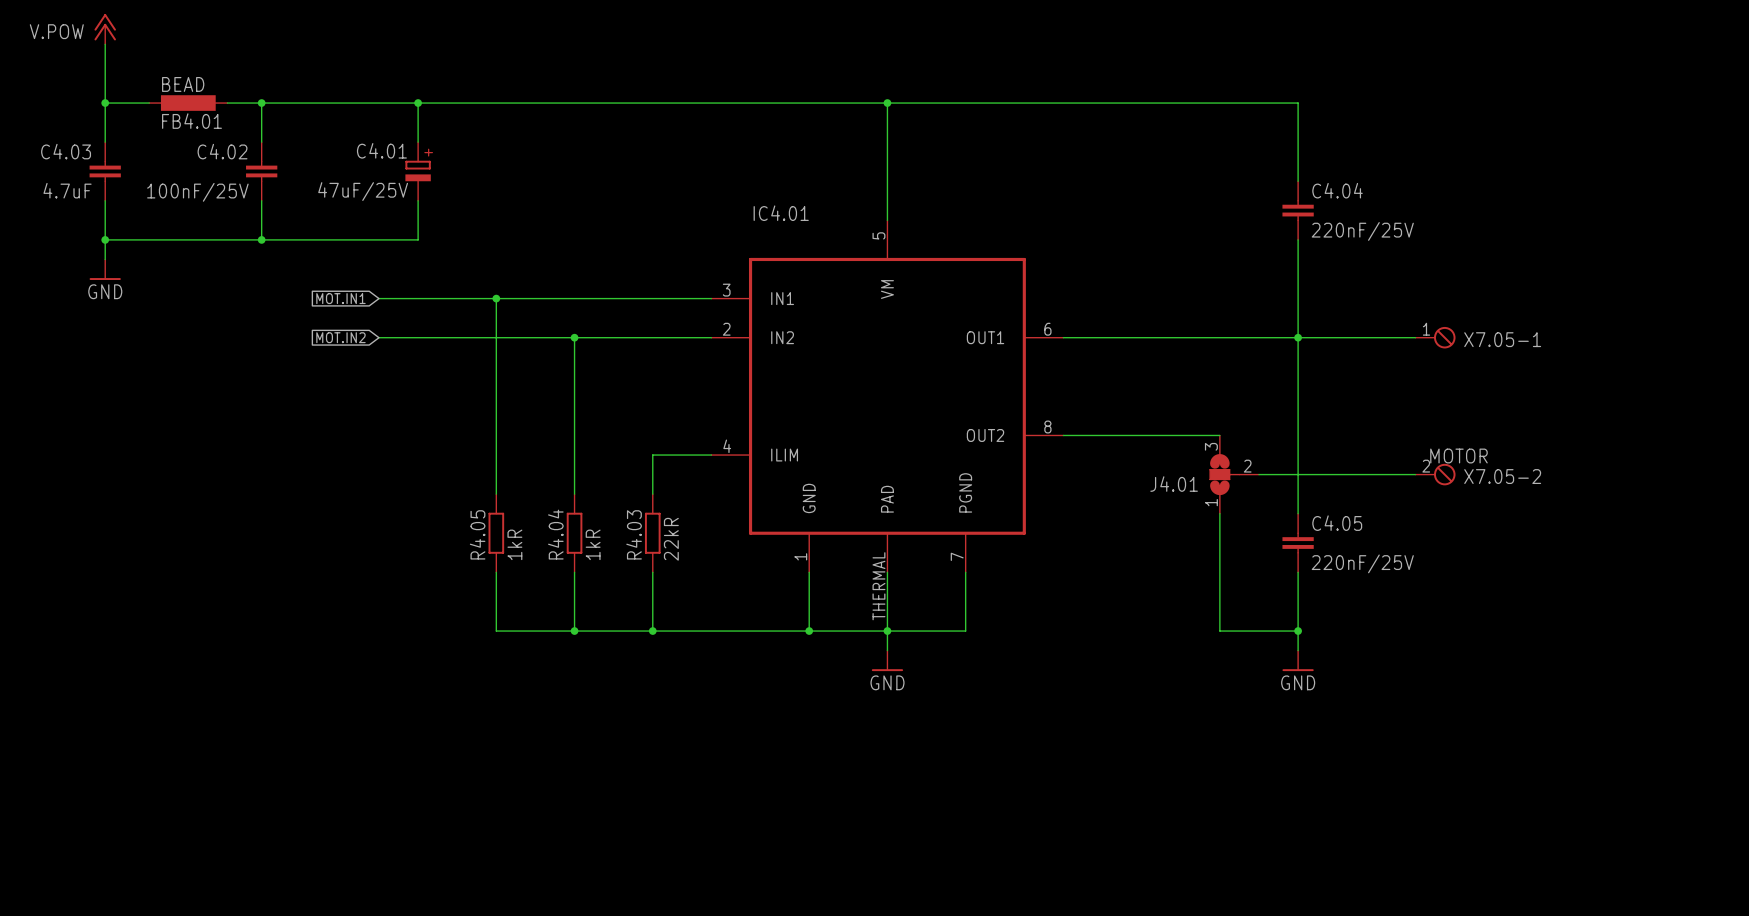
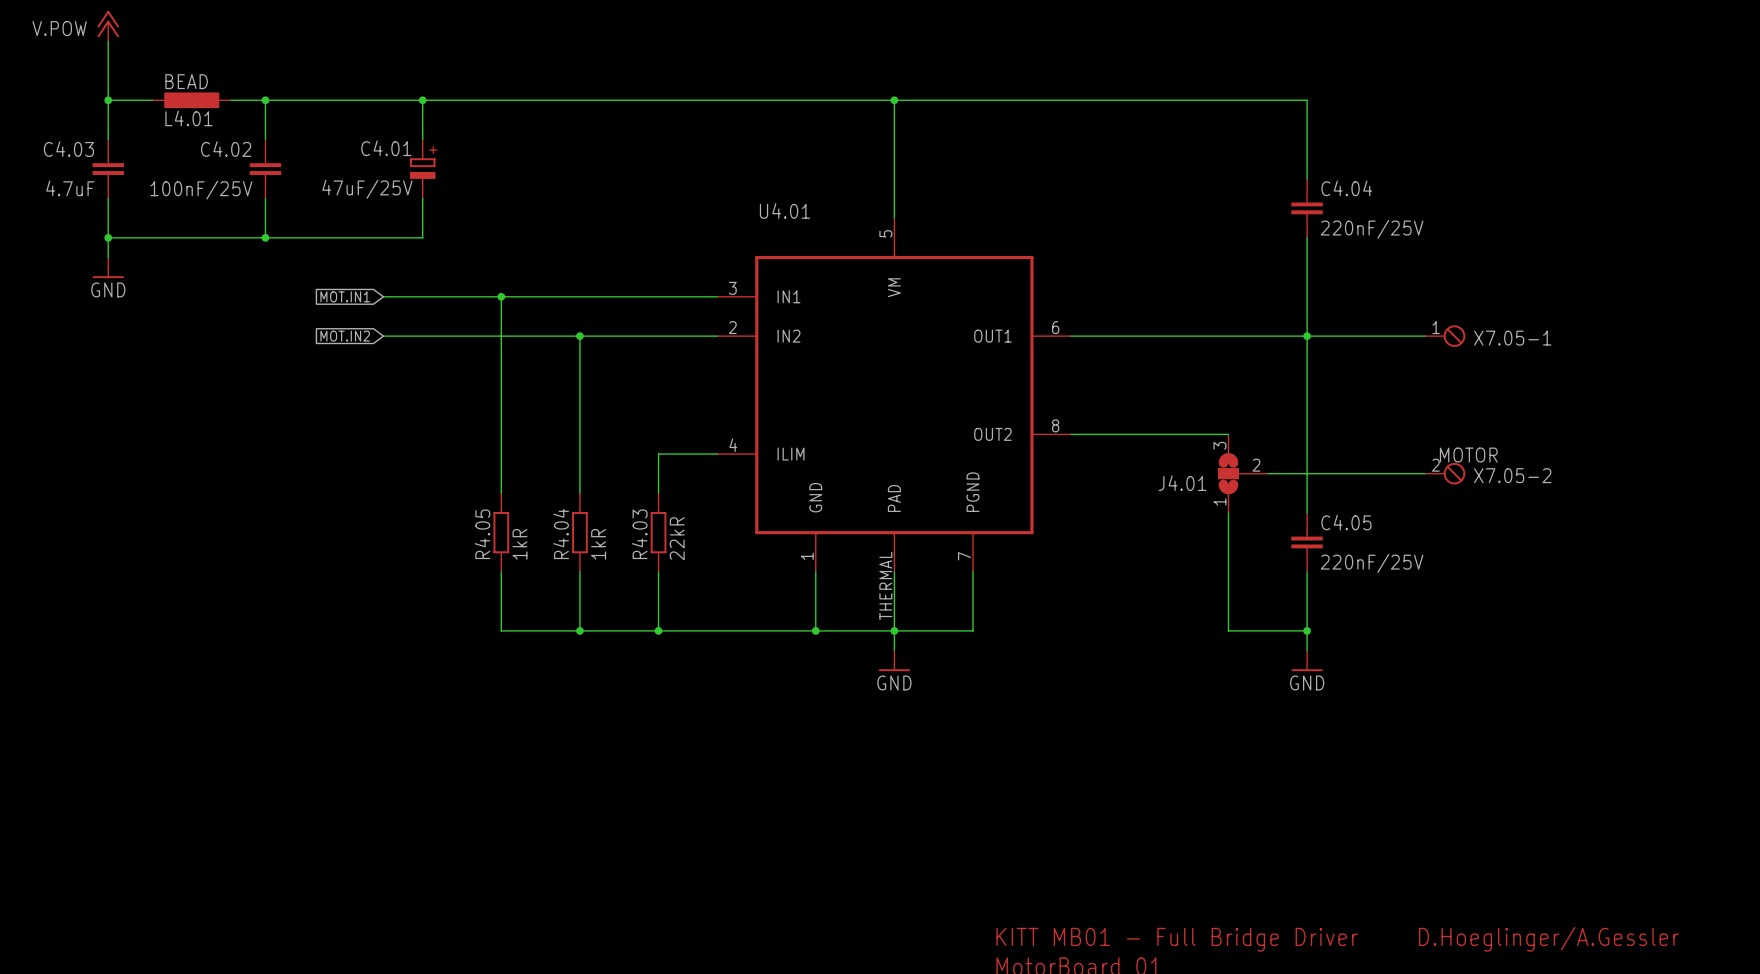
FB4.01 name: FB4.01 (191, 121) -> L4.01 (188, 118)
IC4.01 name: IC4.01 (781, 213) -> U4.01 (784, 211)

